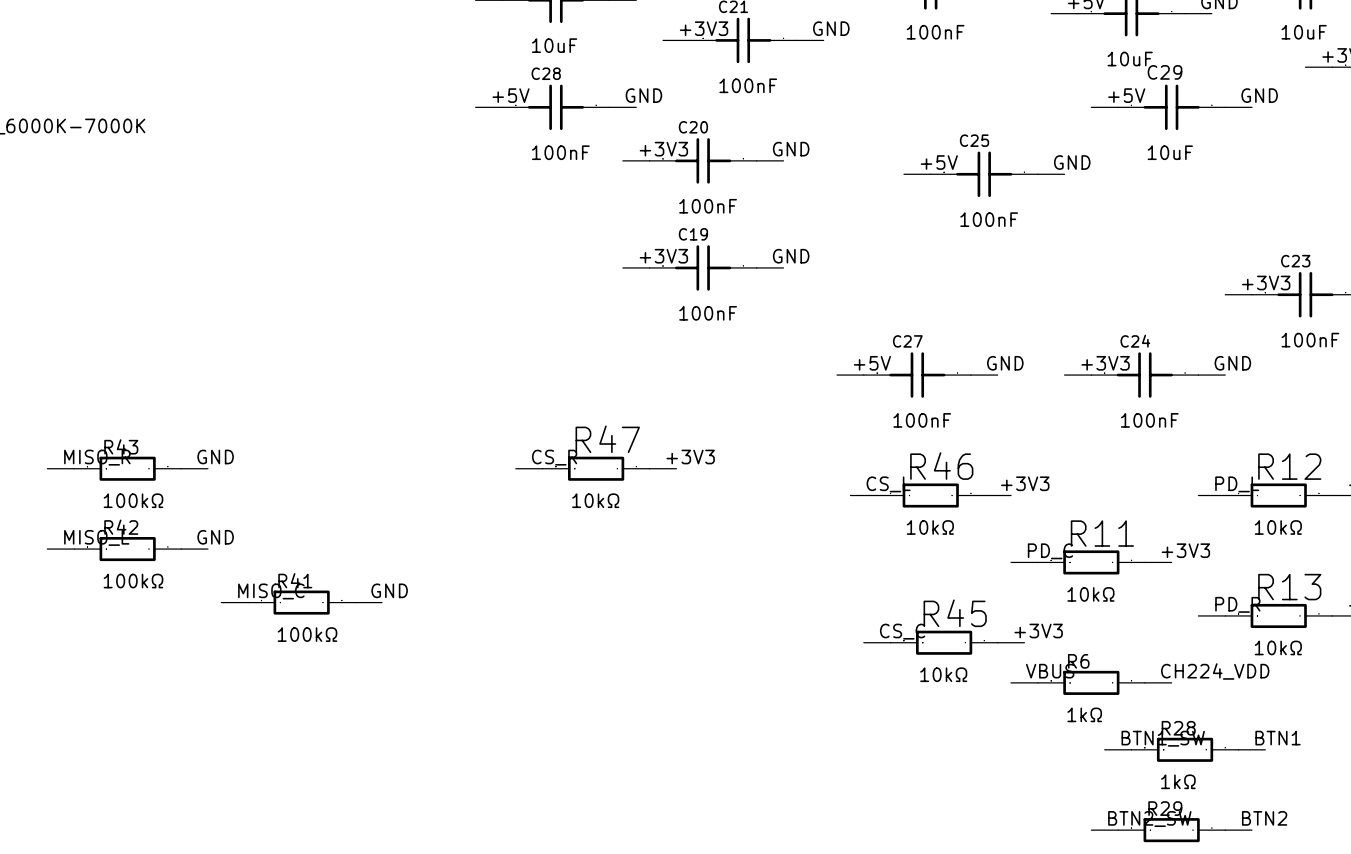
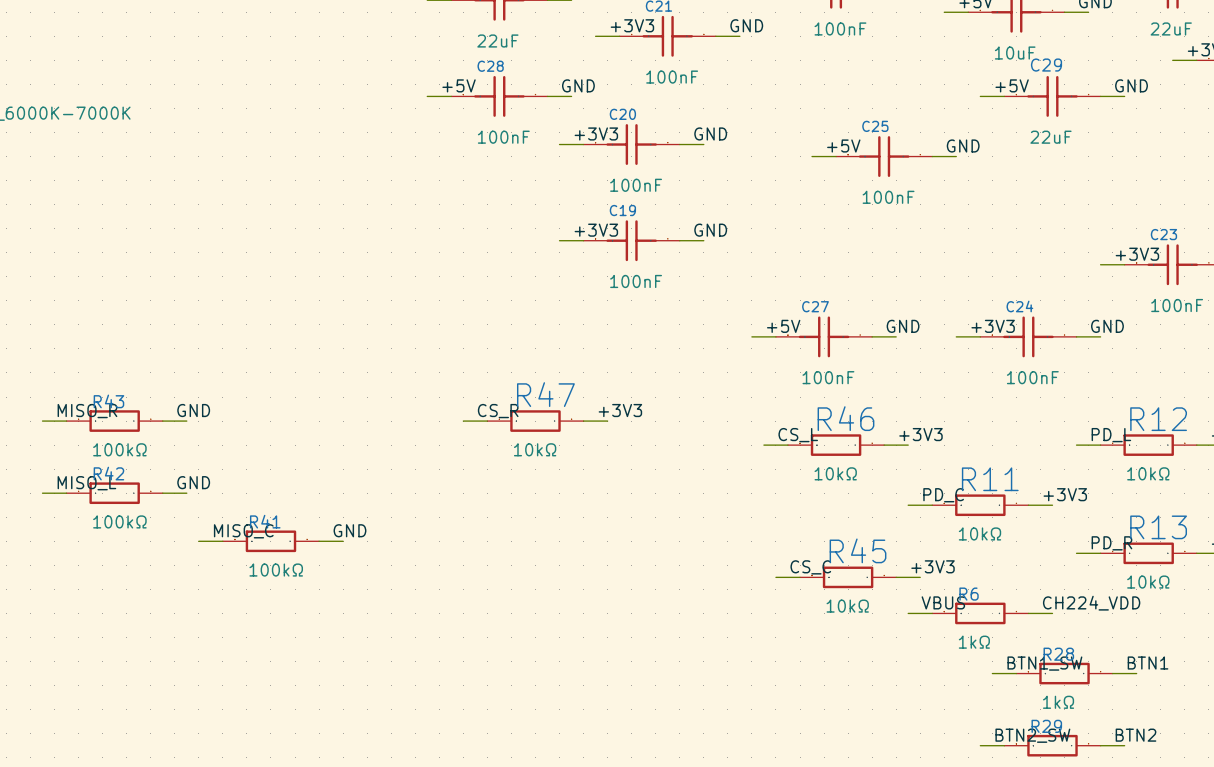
part value: 10uF (1304, 32) -> 22uF (1171, 28)
part value: 10uF (554, 45) -> 22uF (497, 41)
C29 value: 10uF (1170, 152) -> 22uF (1050, 137)

